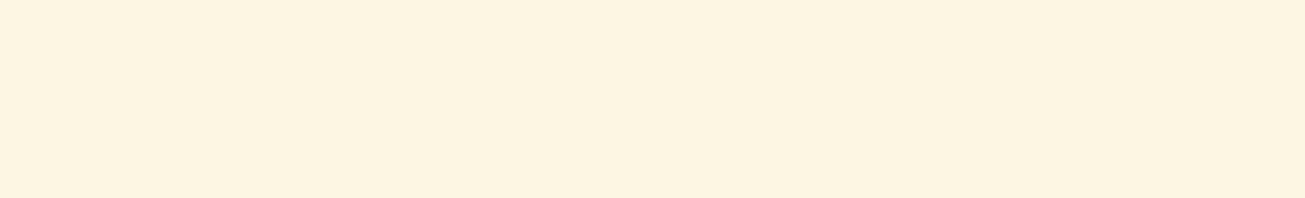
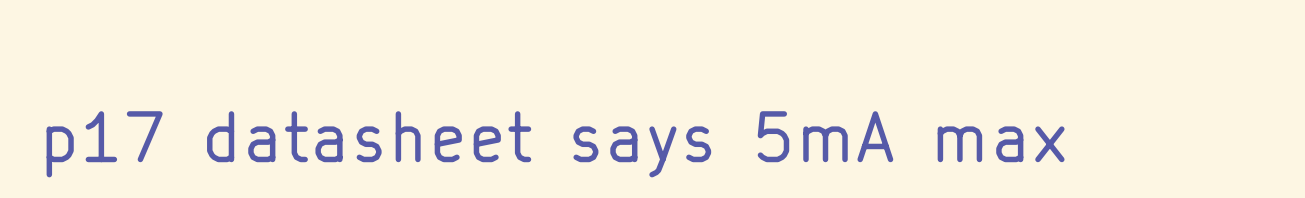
text: none -> p17 datasheet says 5mA max (555, 144)

